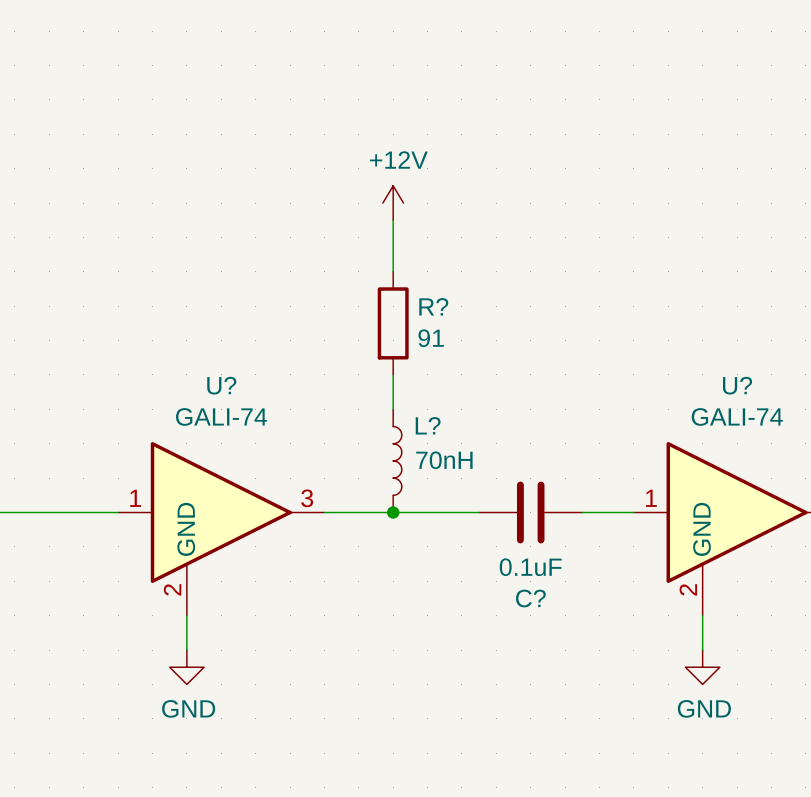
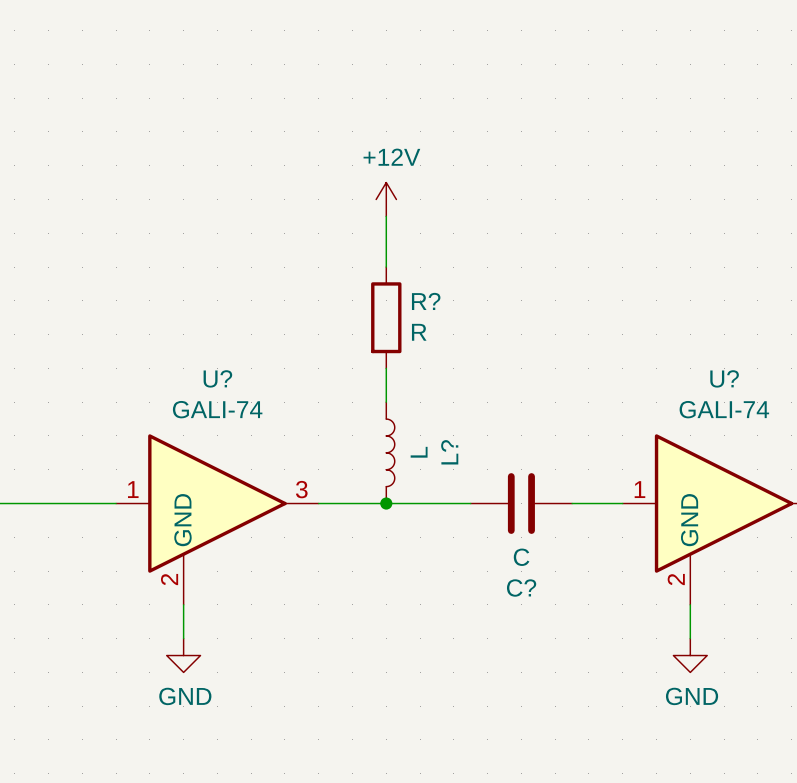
R? value: 91 (431, 338) -> R (419, 332)
L? name rotation: 0° (428, 425) -> 90° counterclockwise (449, 452)
L? name position: L? (428, 425) -> L? (449, 452)
L? value: 70nH (444, 460) -> L (419, 452)
C? value: 0.1uF (530, 567) -> C (521, 557)

